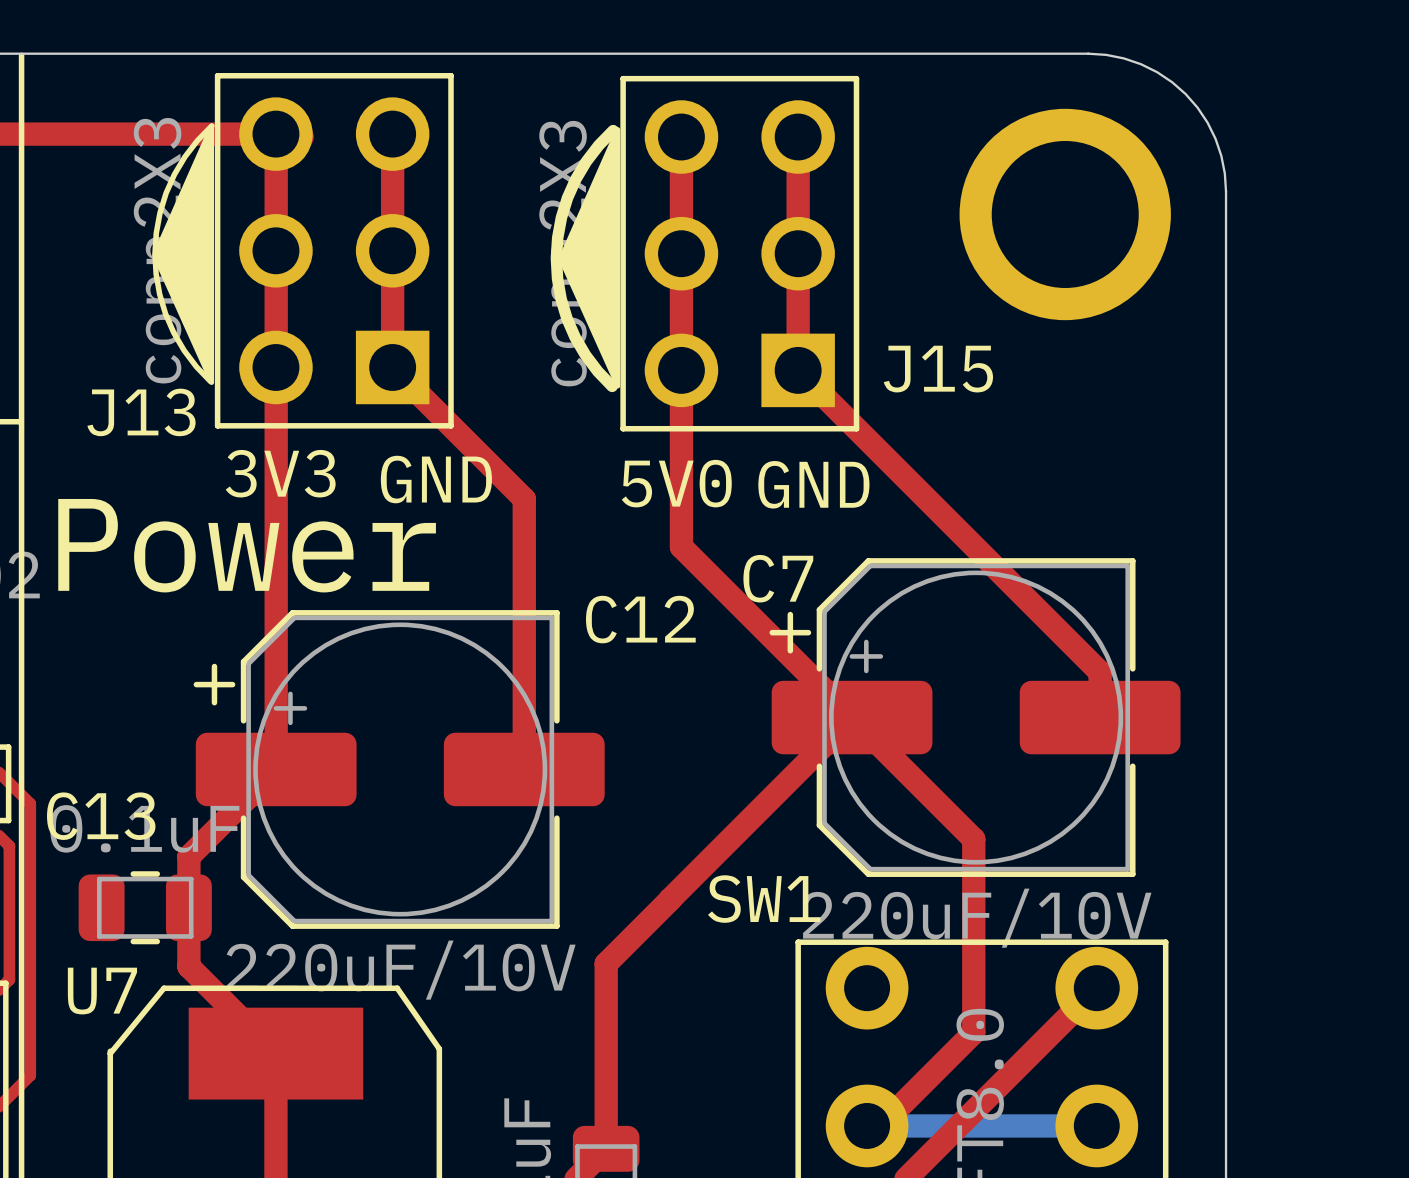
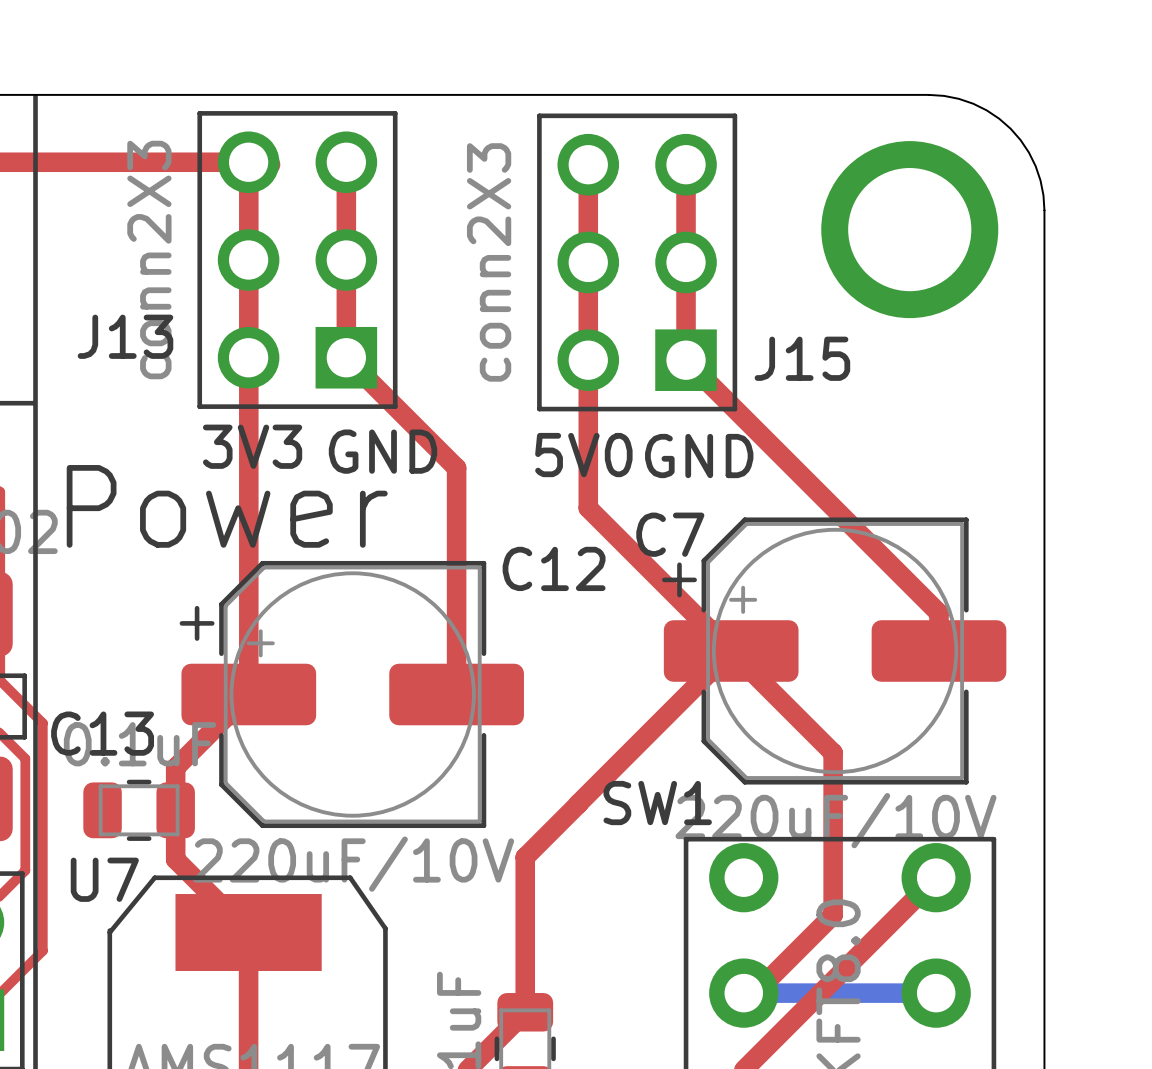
drawing: [152, 123, 215, 385] -> none
line: (211, 125) (197, 140) (174, 174) (160, 212) (155, 253) (159, 294) (165, 313) (184, 350) (210, 381) -> none
drawing: [558, 127, 621, 389] -> none
line: (613, 130) (586, 161) (575, 179) (561, 217) (556, 258) (561, 298) (575, 337) (585, 355) (612, 386) -> none
J13 name position: J13 (141, 412) -> J13 (125, 336)

